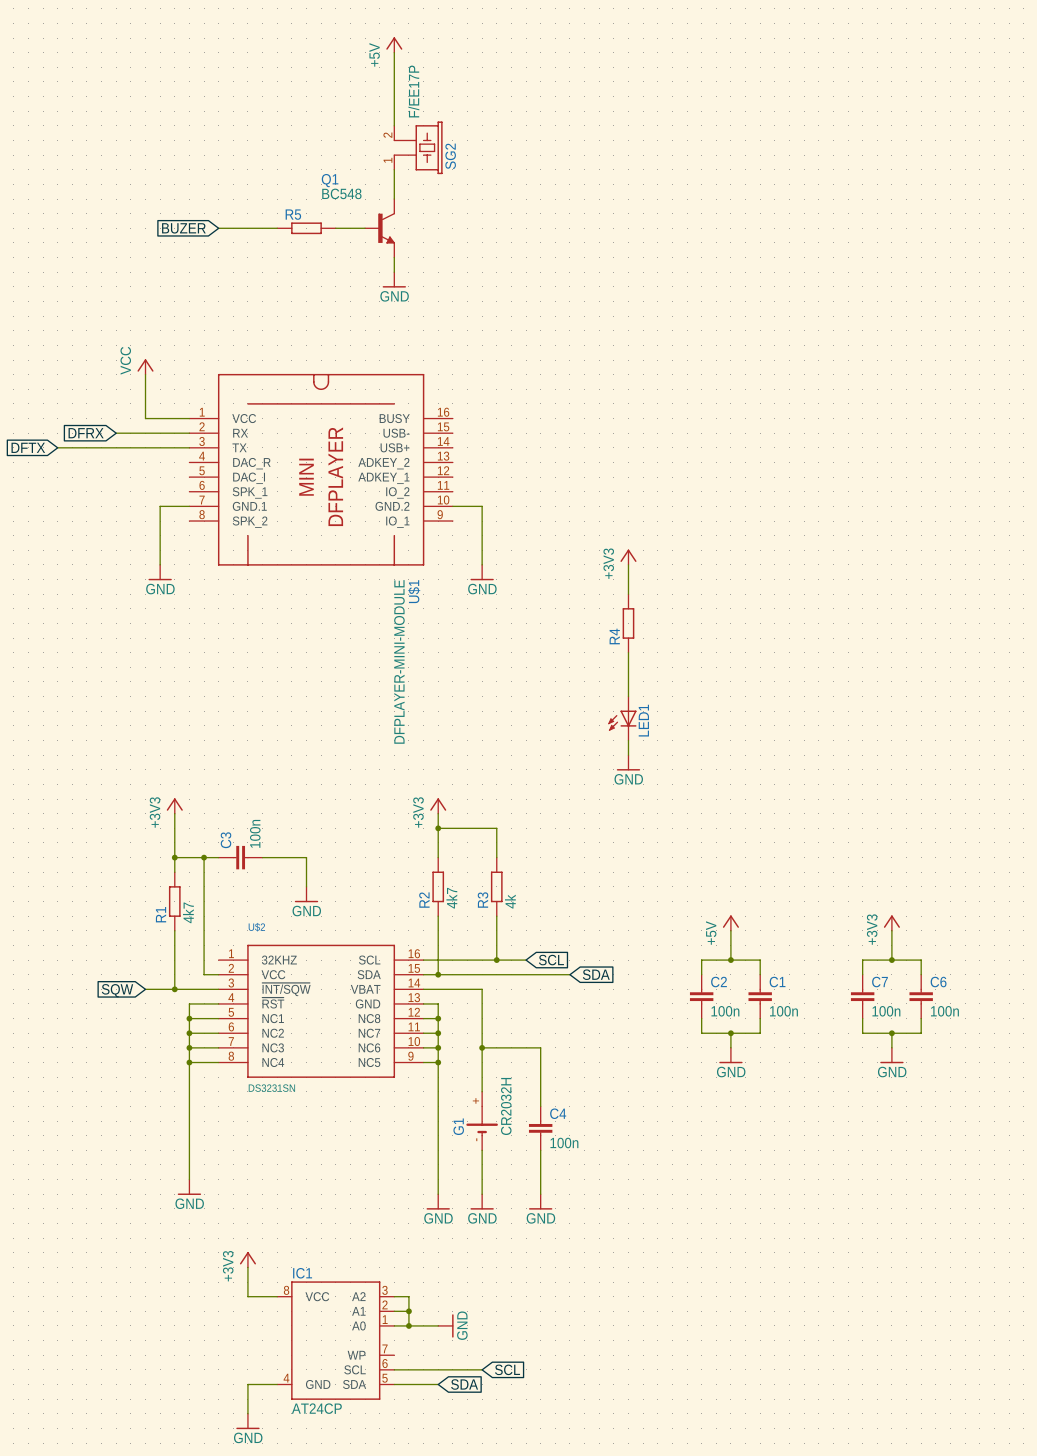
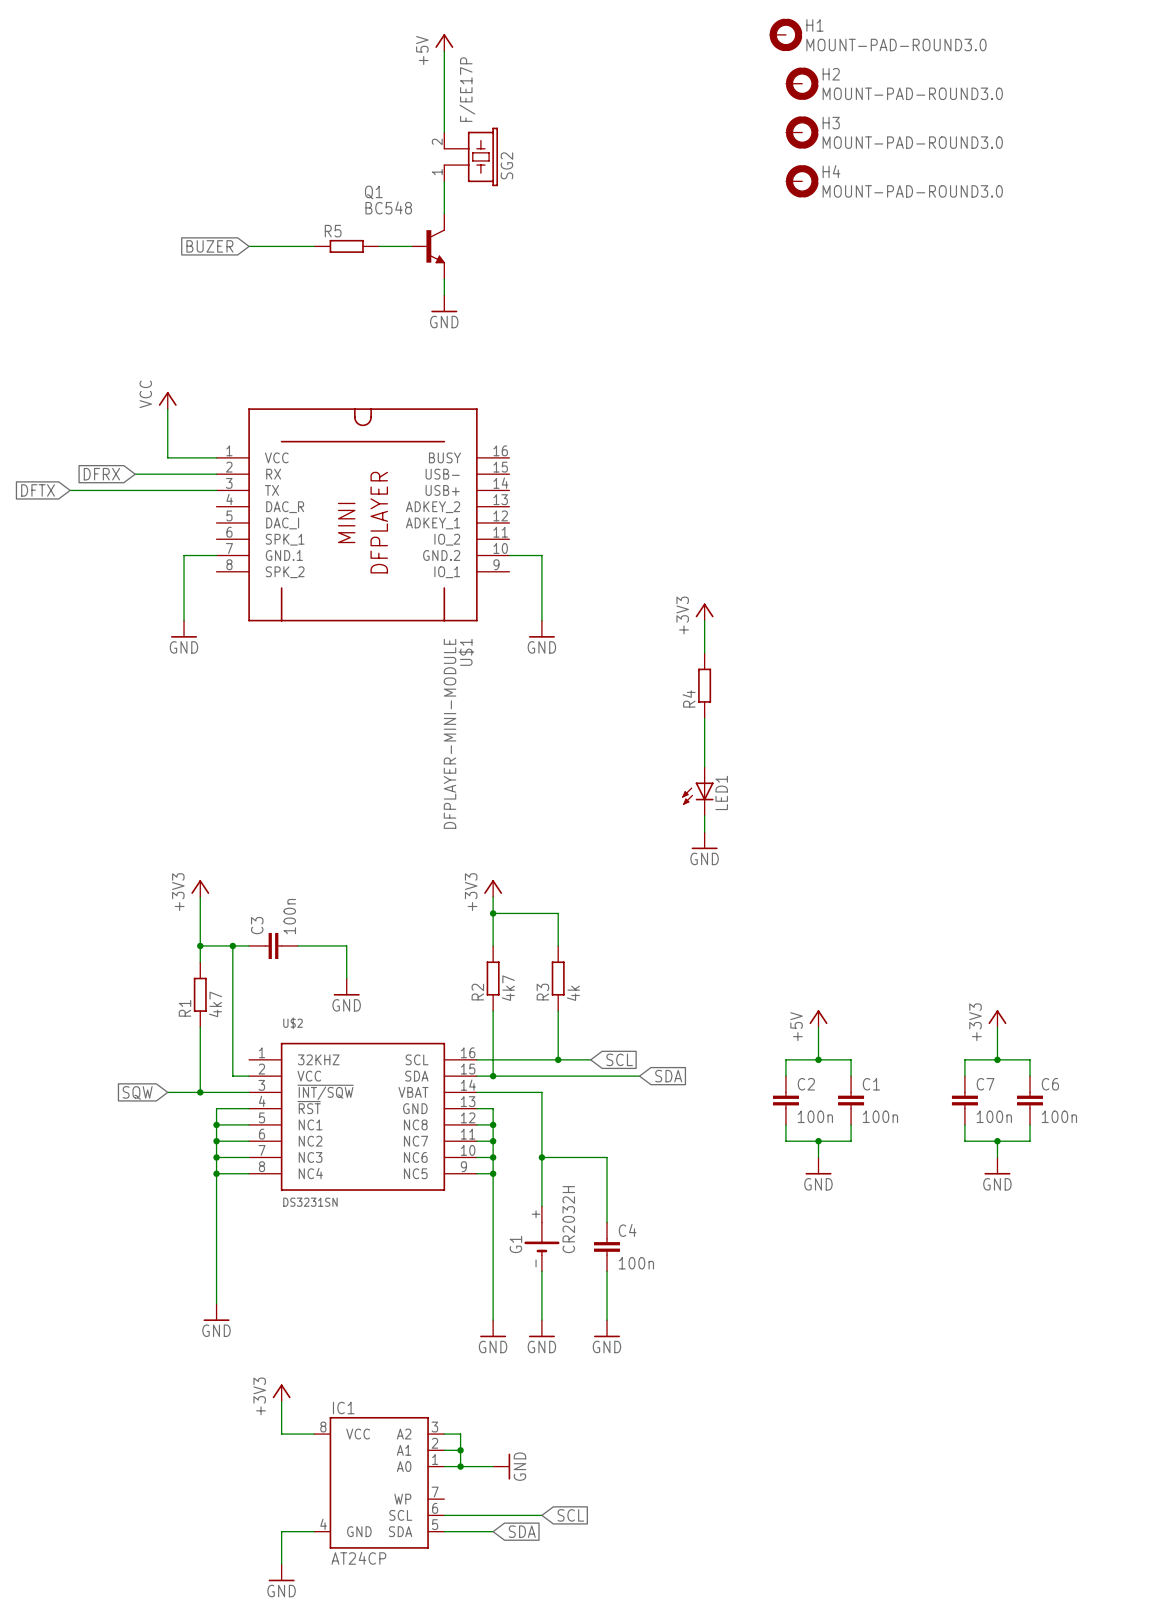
H1: none -> MOUNT-PAD-ROUND3.0 (785, 34)
H2: none -> MOUNT-PAD-ROUND3.0 (802, 83)
H3: none -> MOUNT-PAD-ROUND3.0 (802, 132)
H4: none -> MOUNT-PAD-ROUND3.0 (802, 181)

